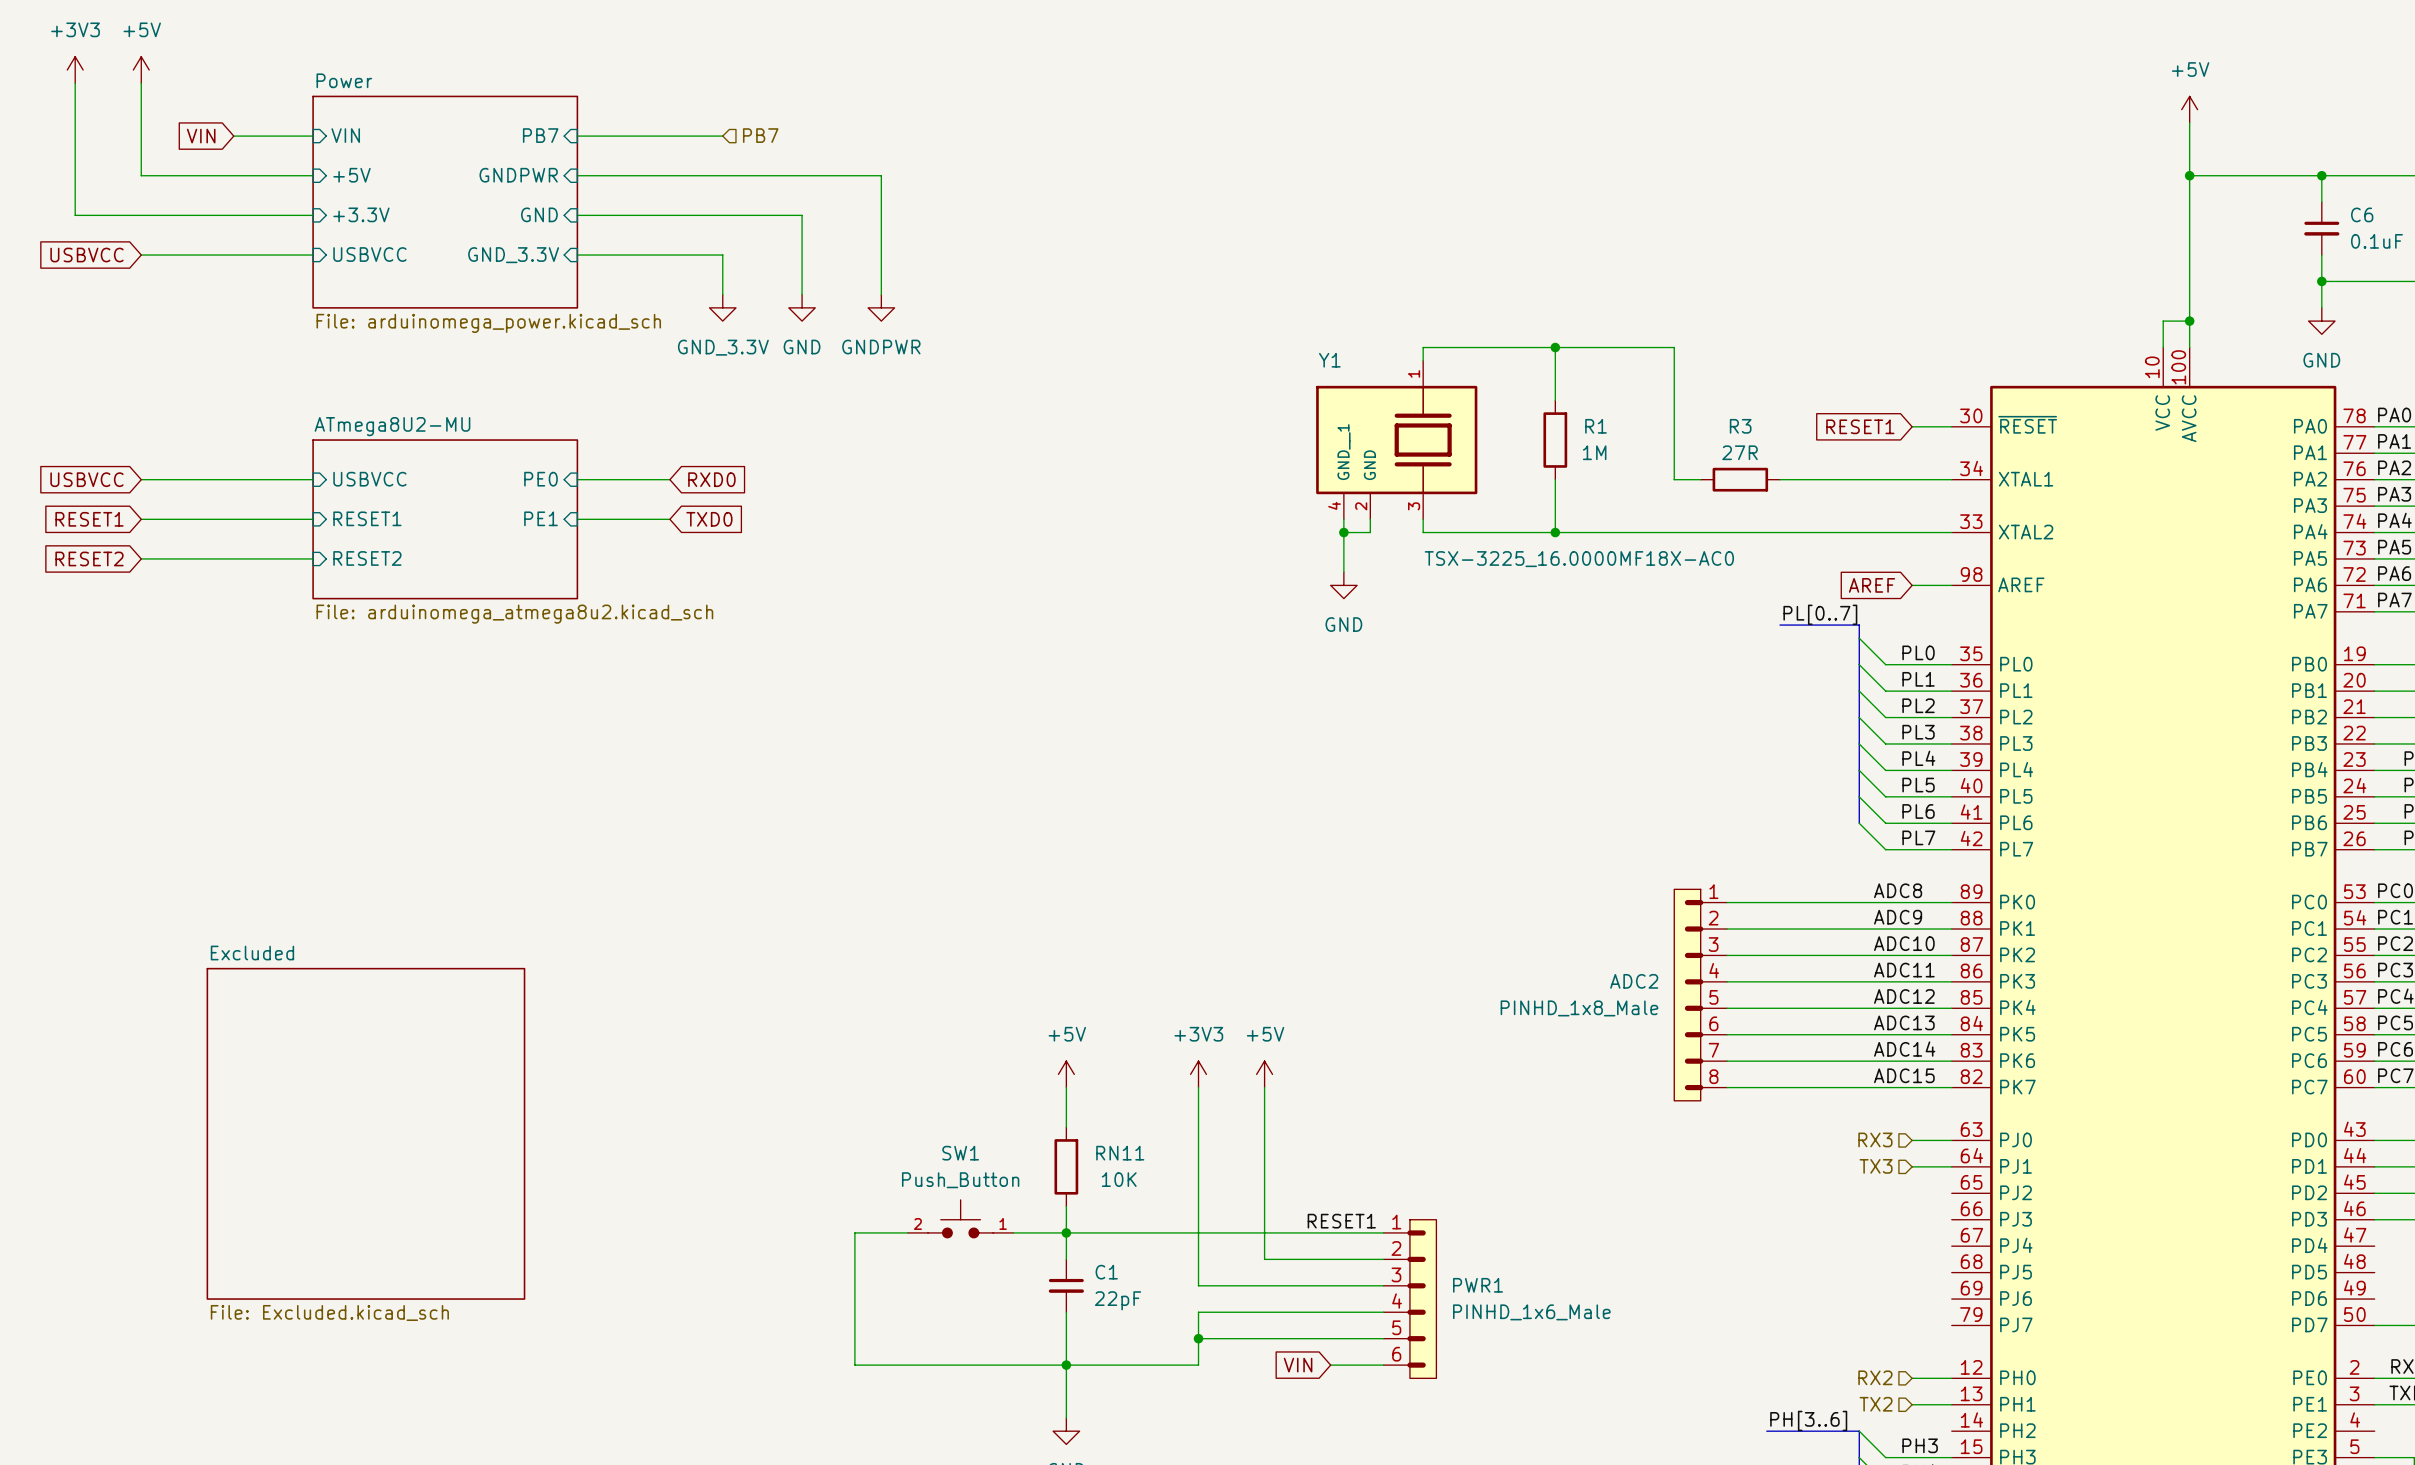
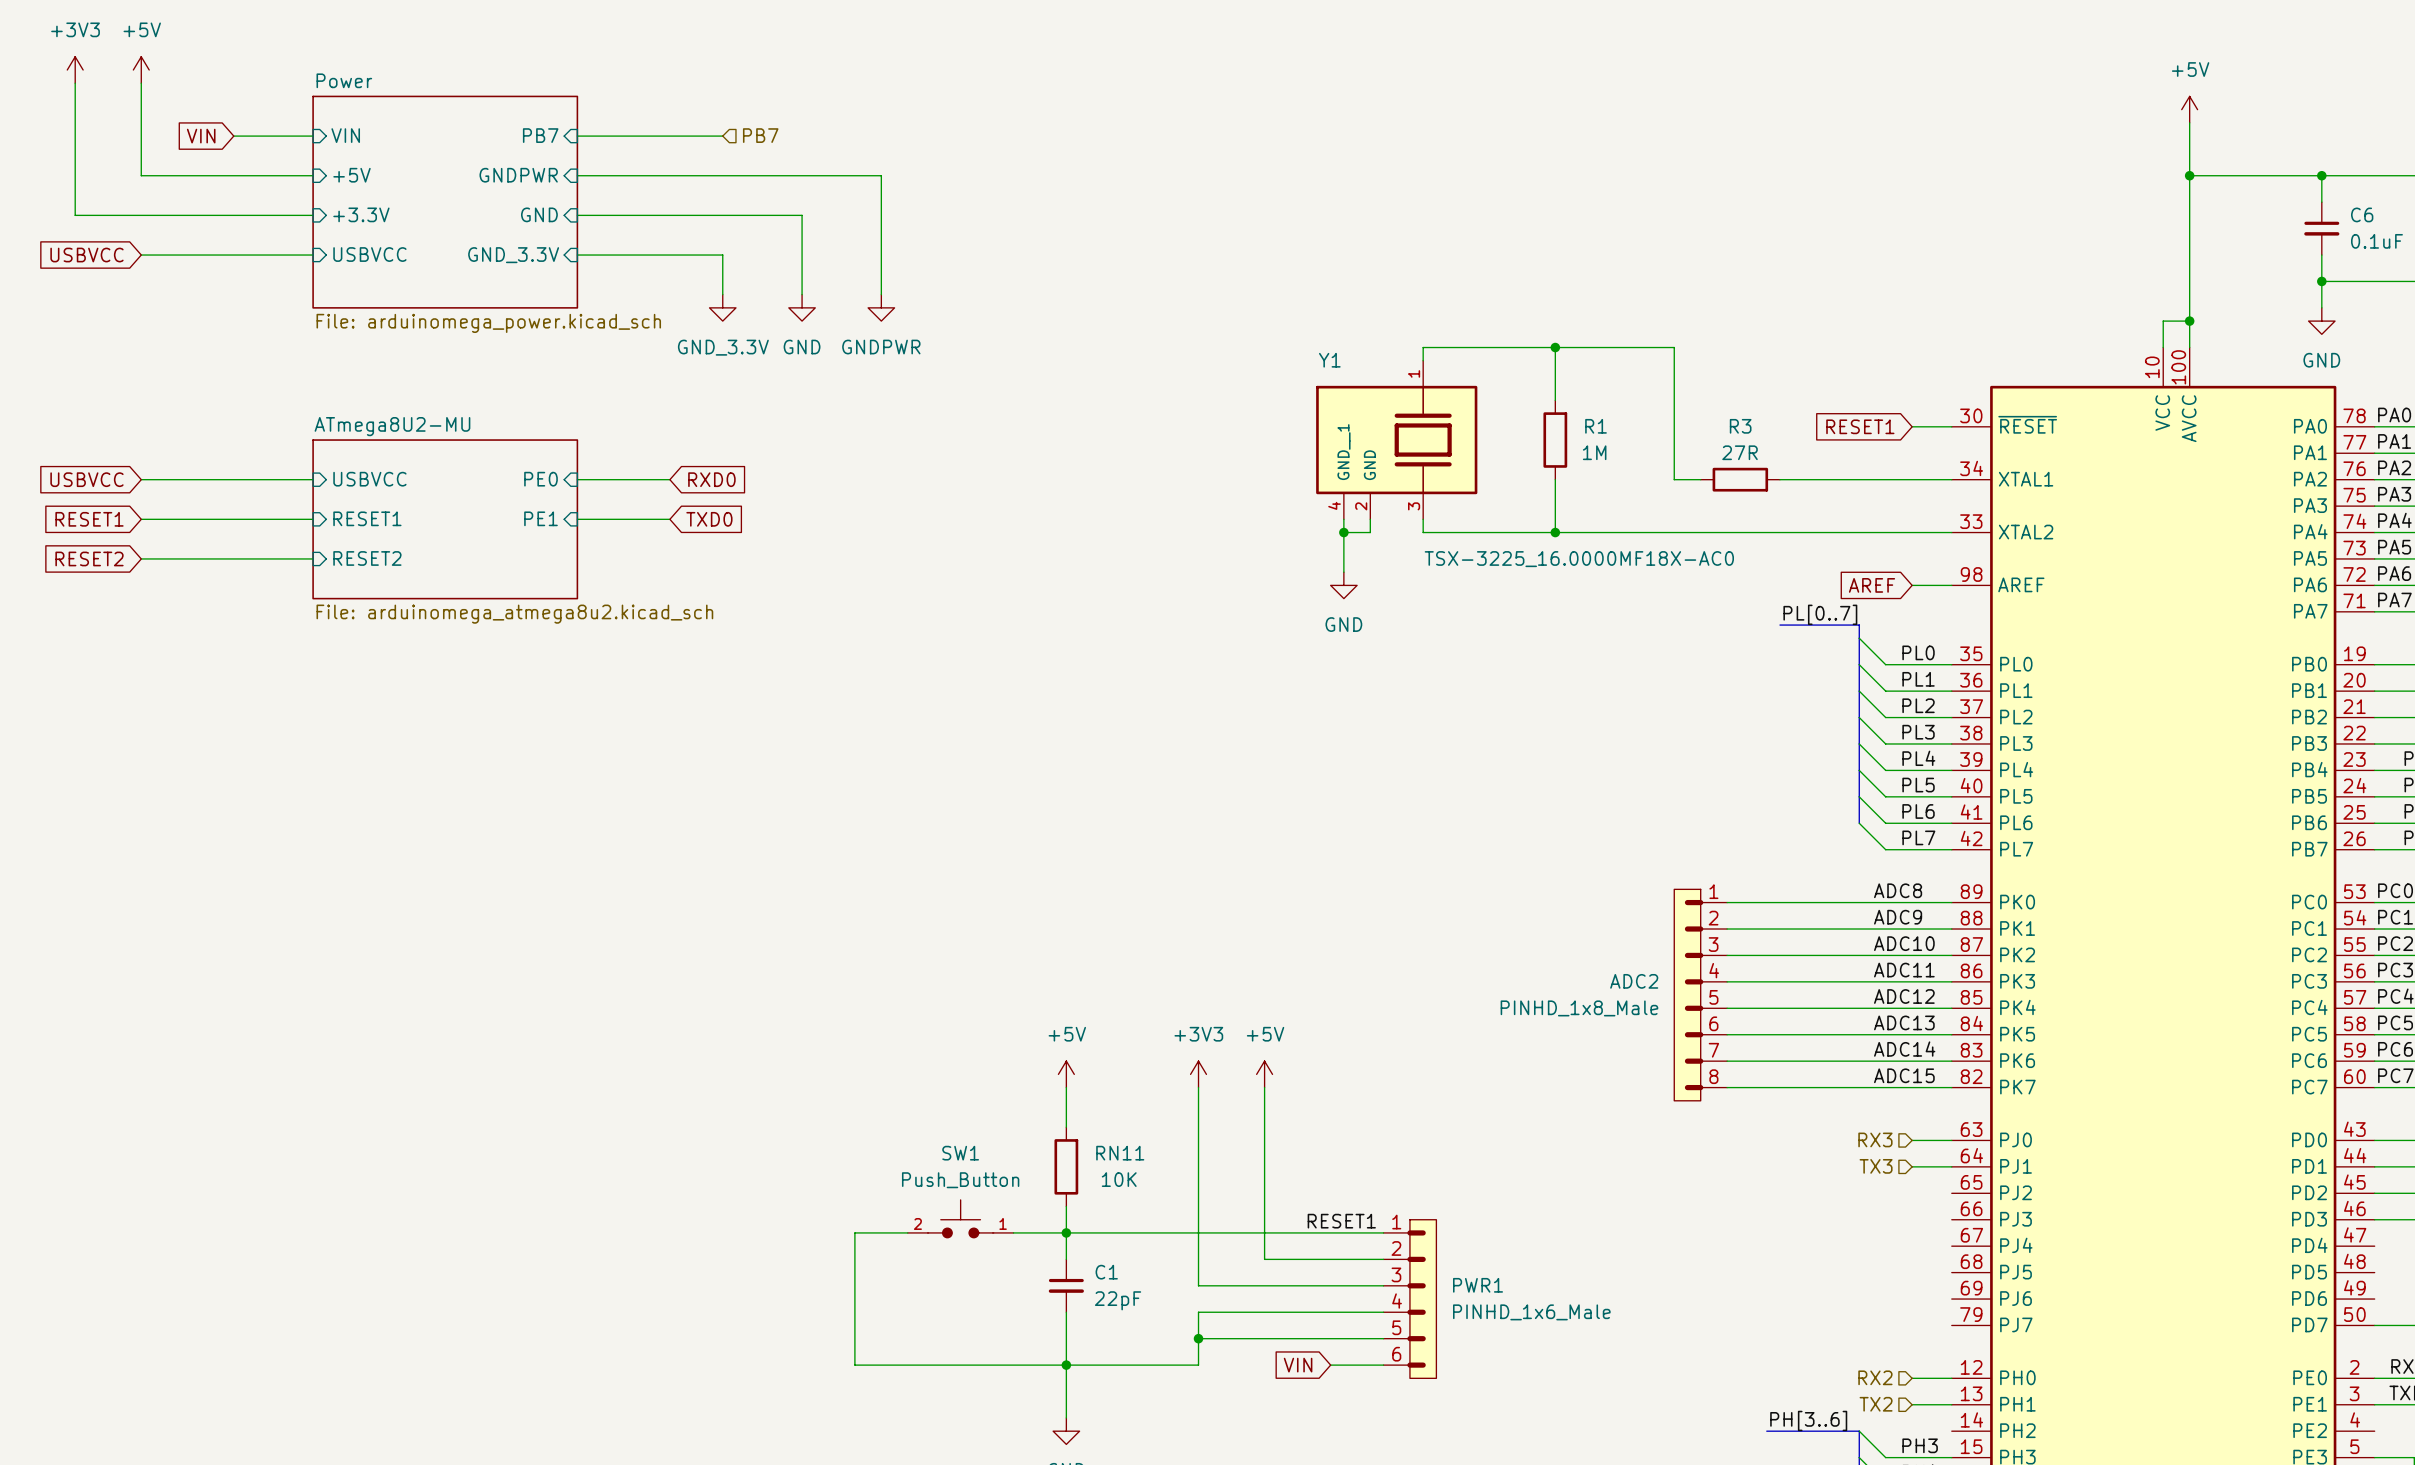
sheet Excluded: File: Excluded.kicad_sch (365, 1133) -> none

